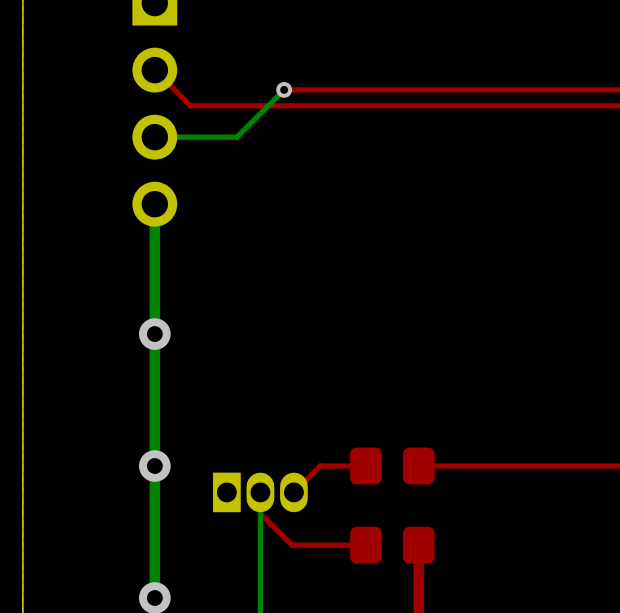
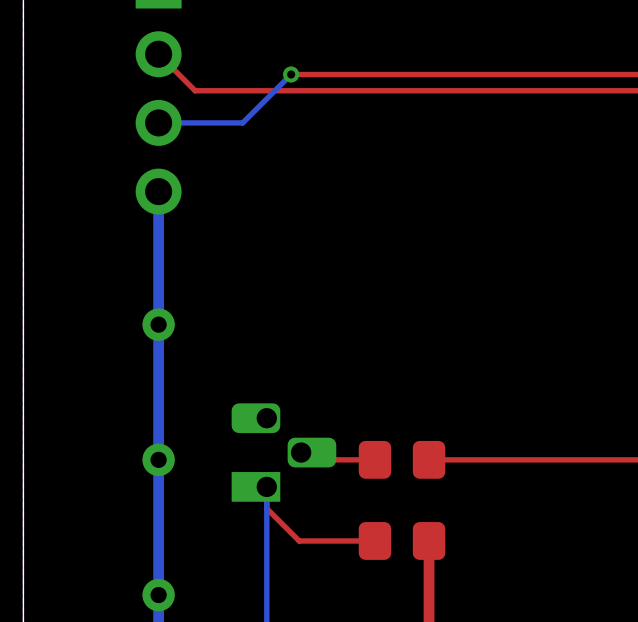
part: none -> (283, 452)
top track: (320, 466) (293, 492) -> none
part: (260, 492) -> none

